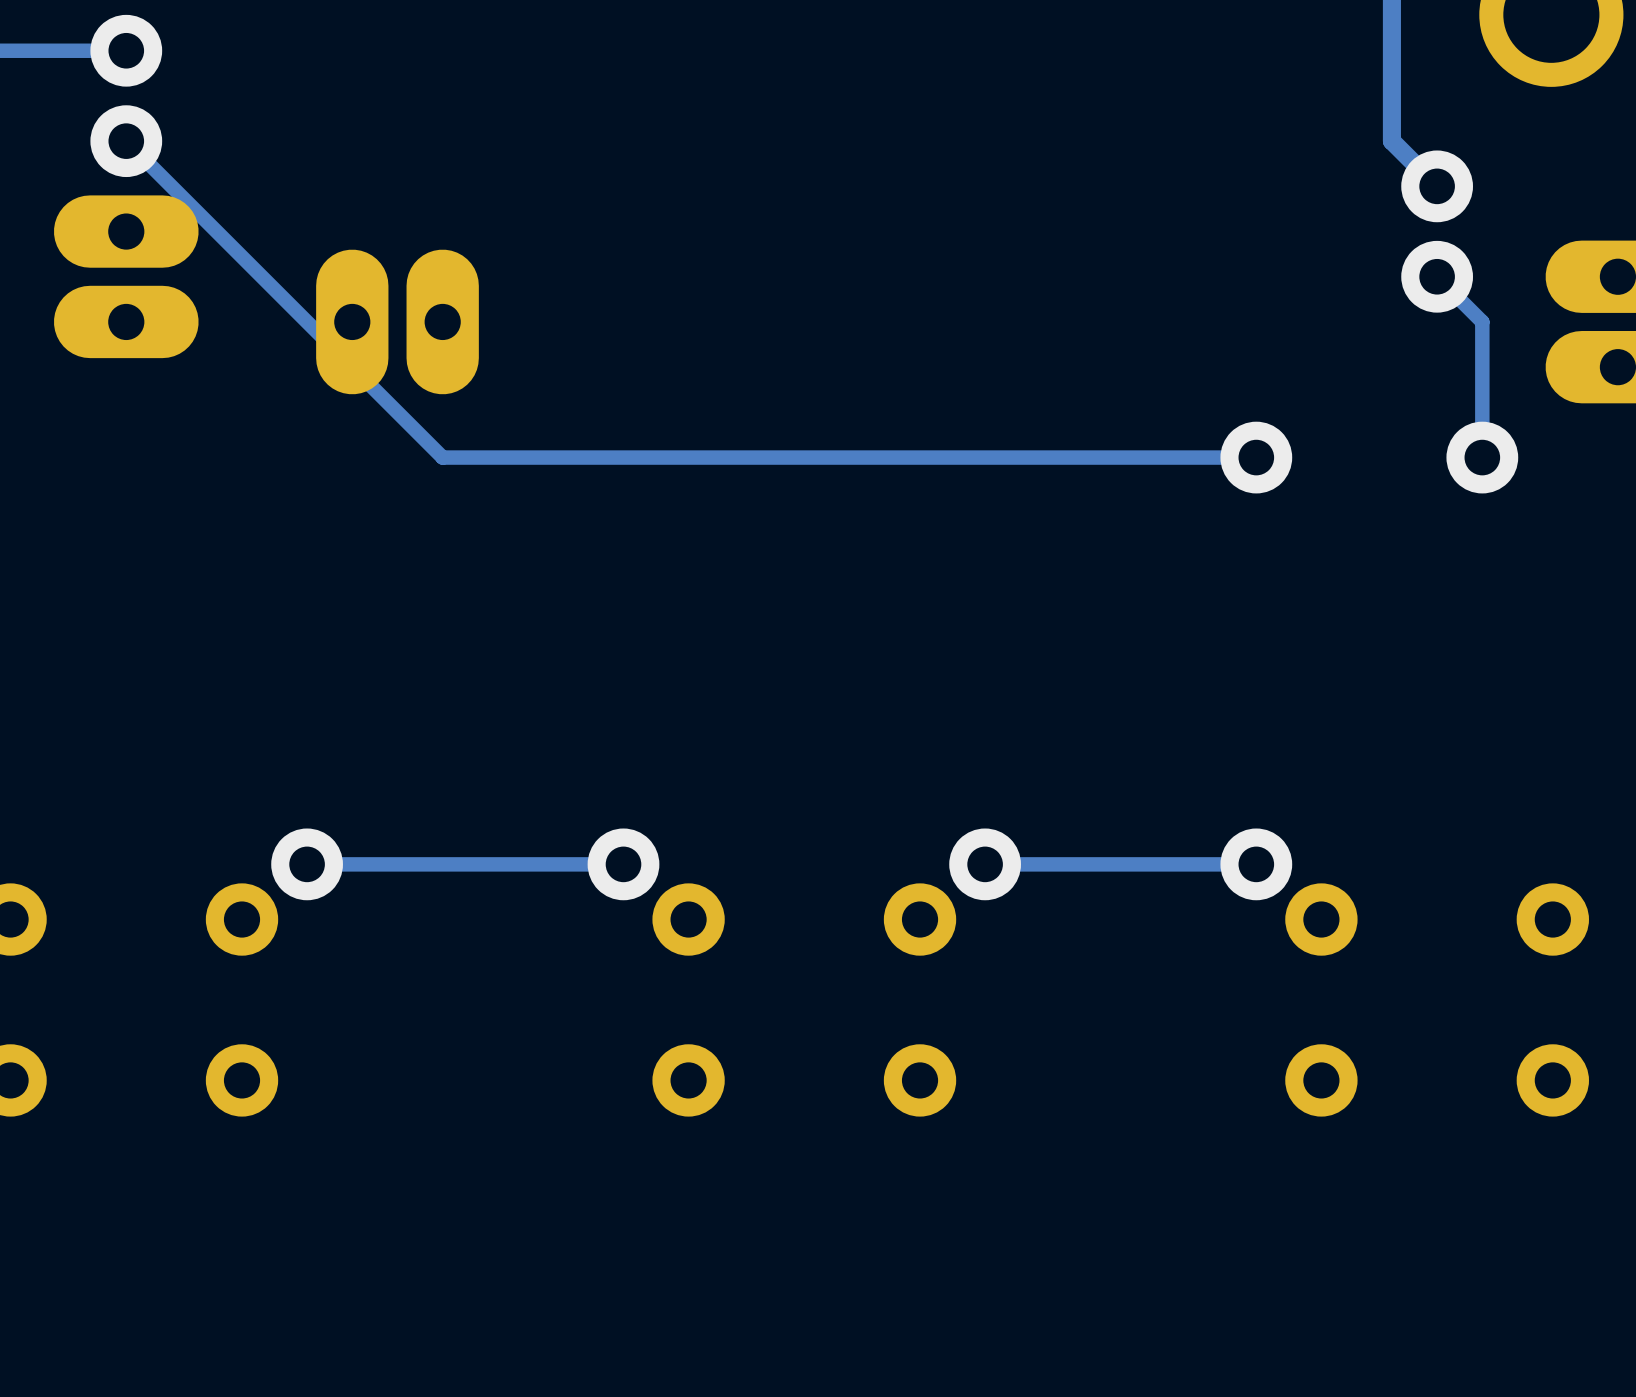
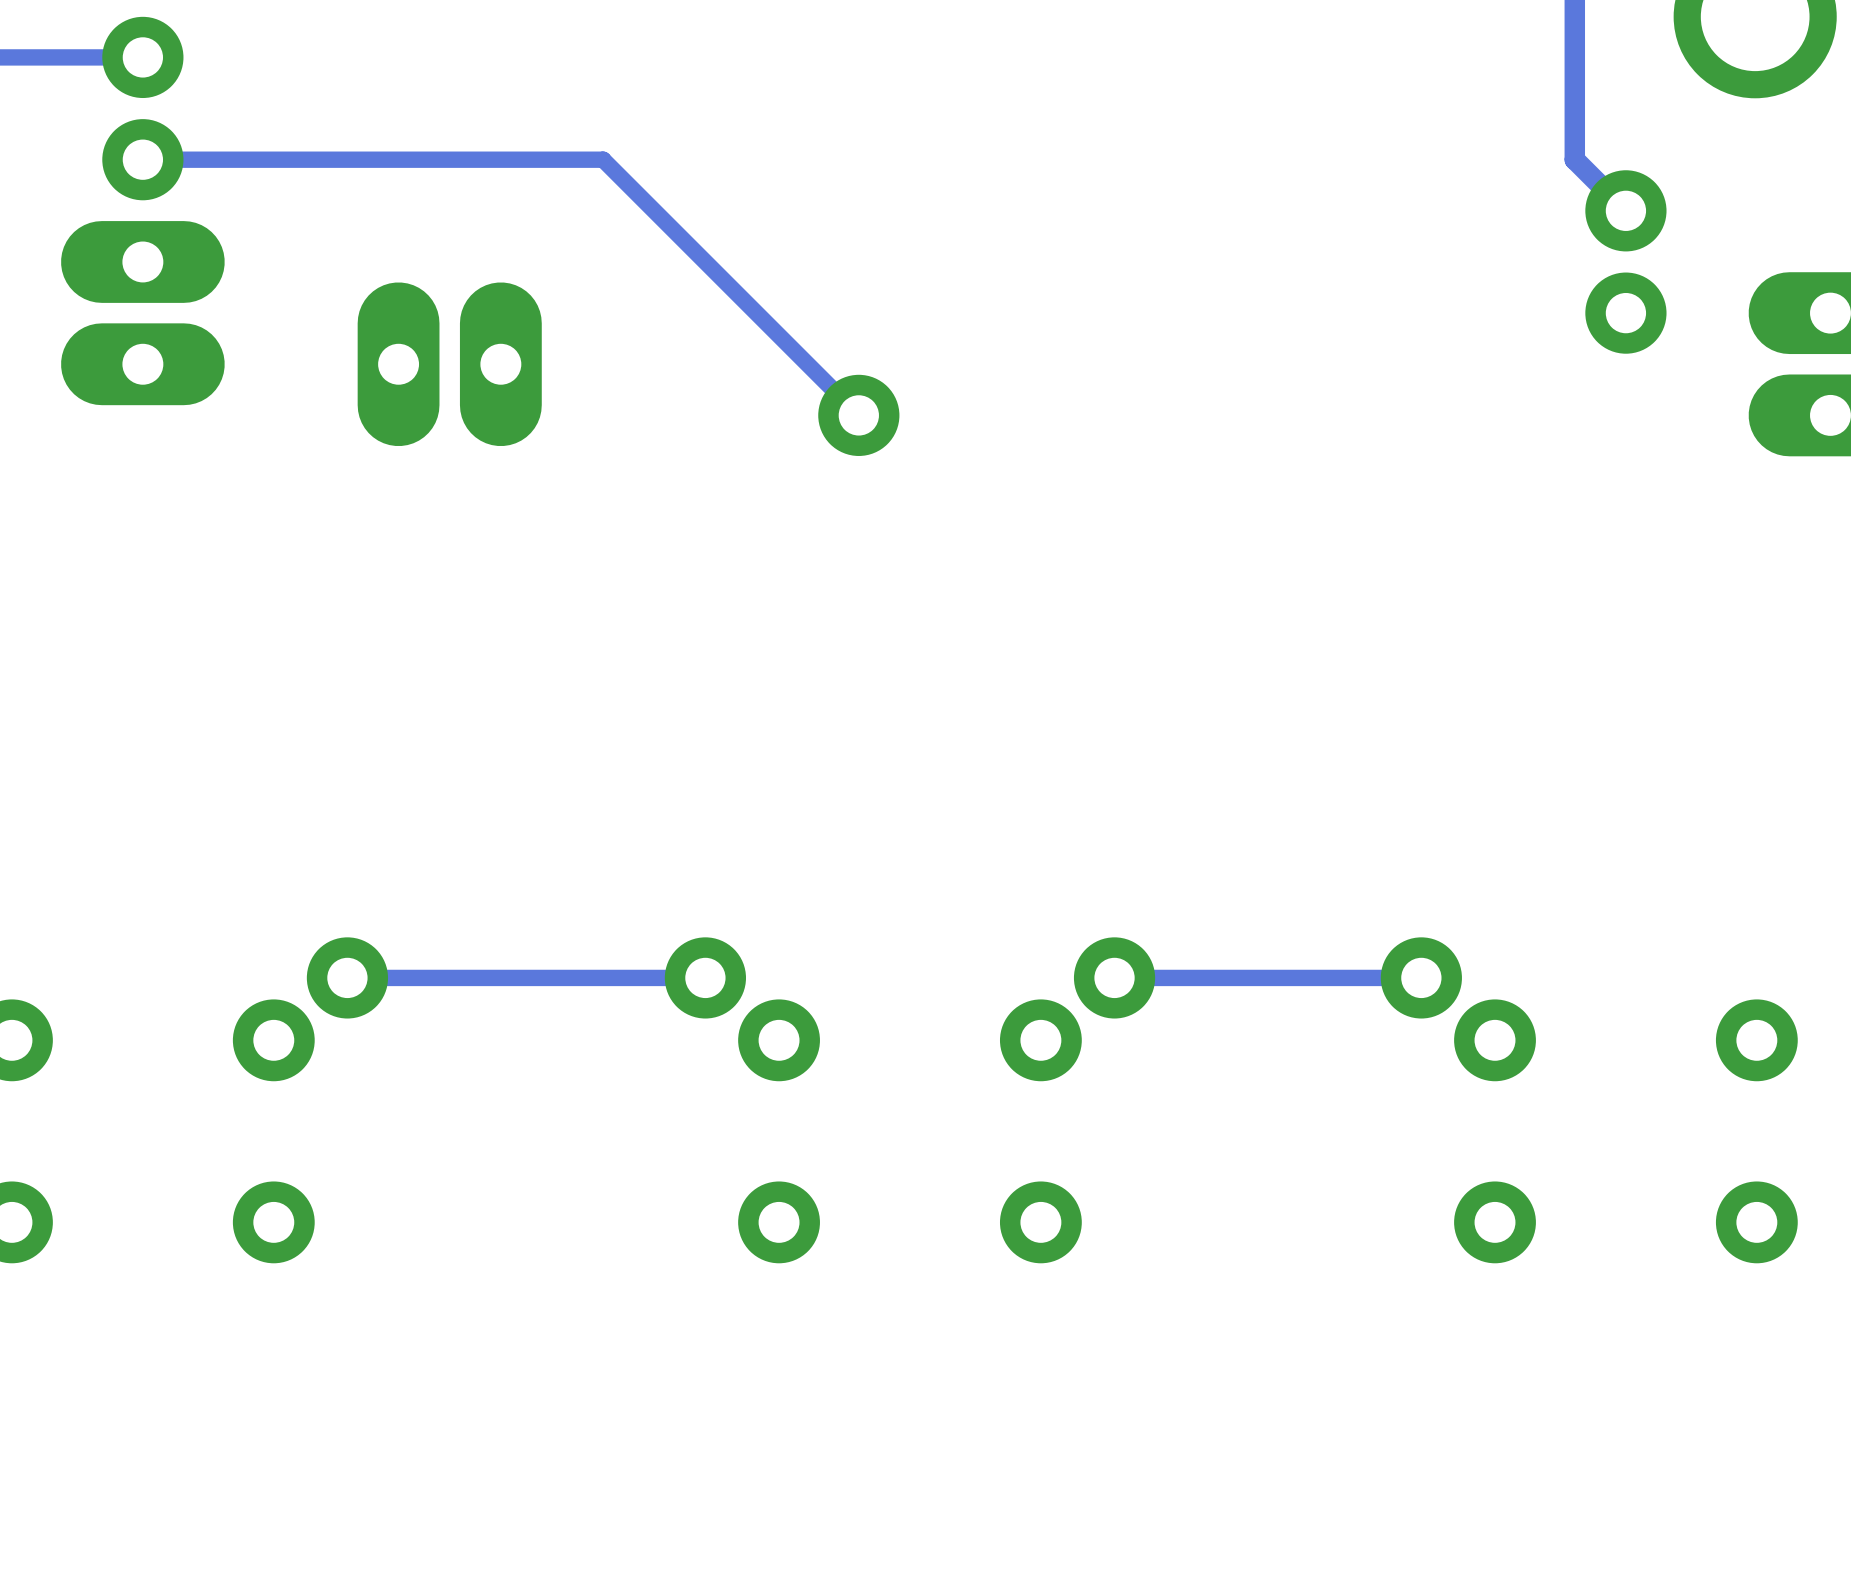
track: (126, 141) (442, 457) (1256, 457) -> (142, 159) (603, 159) (858, 415)
track: (1437, 276) (1482, 321) (1482, 457) -> none
via: none -> (858, 415)
via: (1256, 457) -> none
via: (1482, 457) -> none

